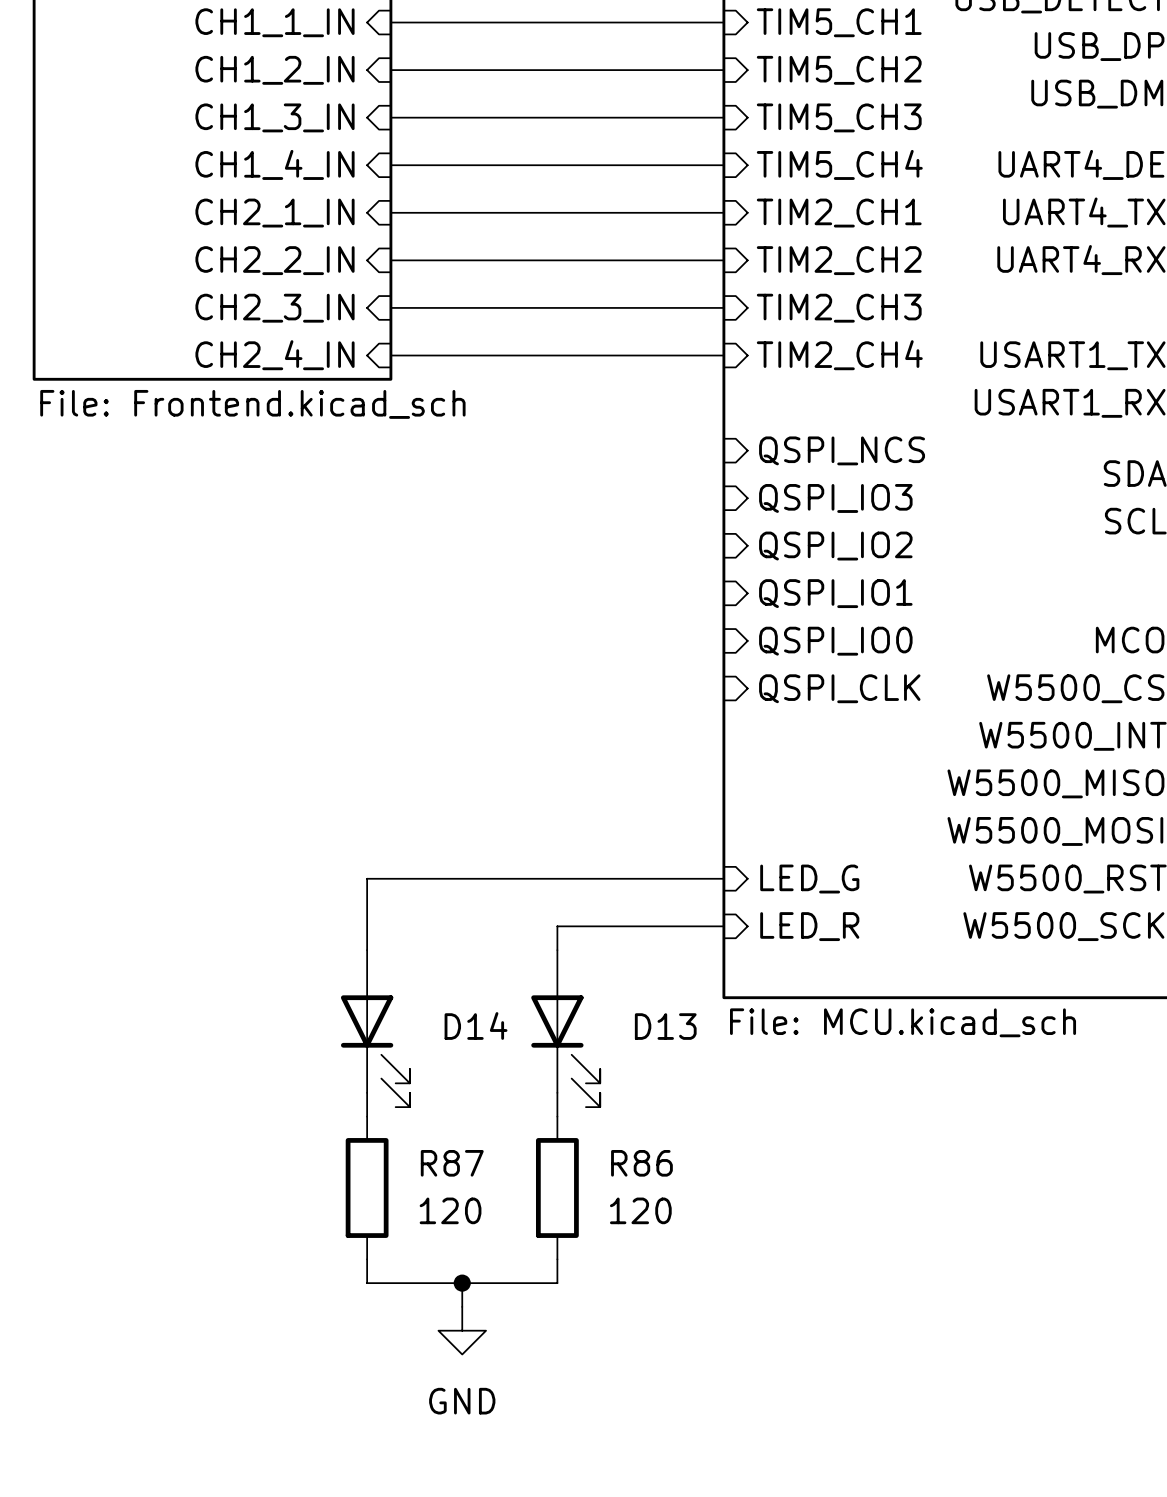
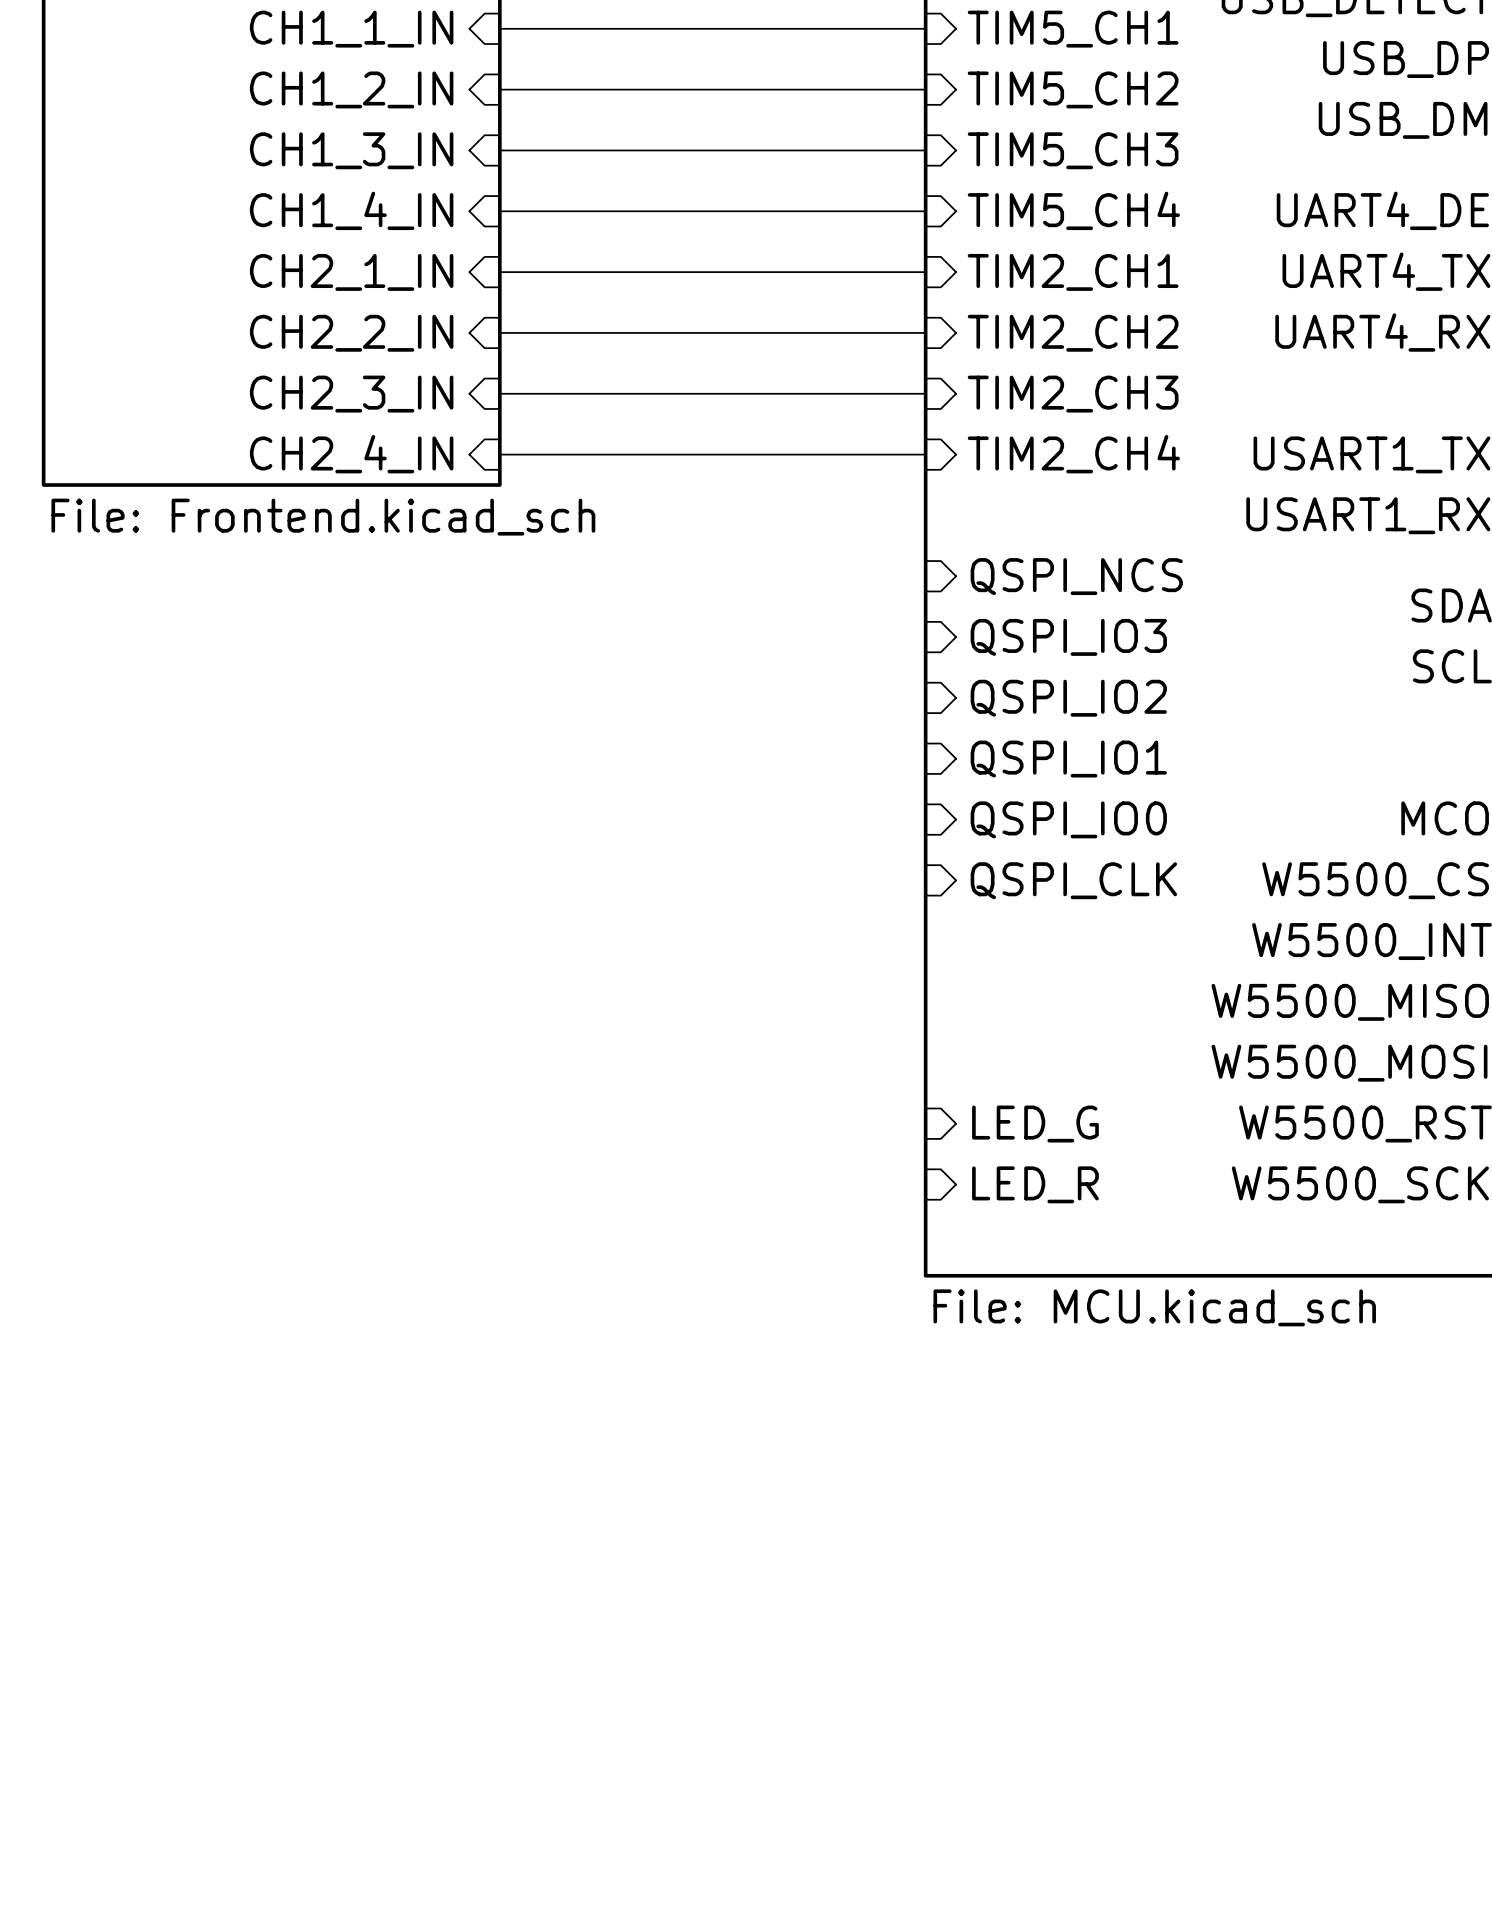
wire: (723, 878) (367, 878) (367, 950) -> none
wire: (723, 926) (557, 926) (557, 950) -> none
D14: (375, 1028) -> none
D13: (565, 1028) -> none
wire: (367, 1092) (367, 1116) -> none
wire: (557, 1092) (557, 1116) -> none
R87: 120 (367, 1187) -> none
R86: 120 (557, 1187) -> none
wire: (367, 1259) (367, 1283) (557, 1283) (557, 1259) -> none
wire: (462, 1283) (462, 1306) -> none
junction: (462, 1283) -> none
power symbol: GND (462, 1330) -> none

